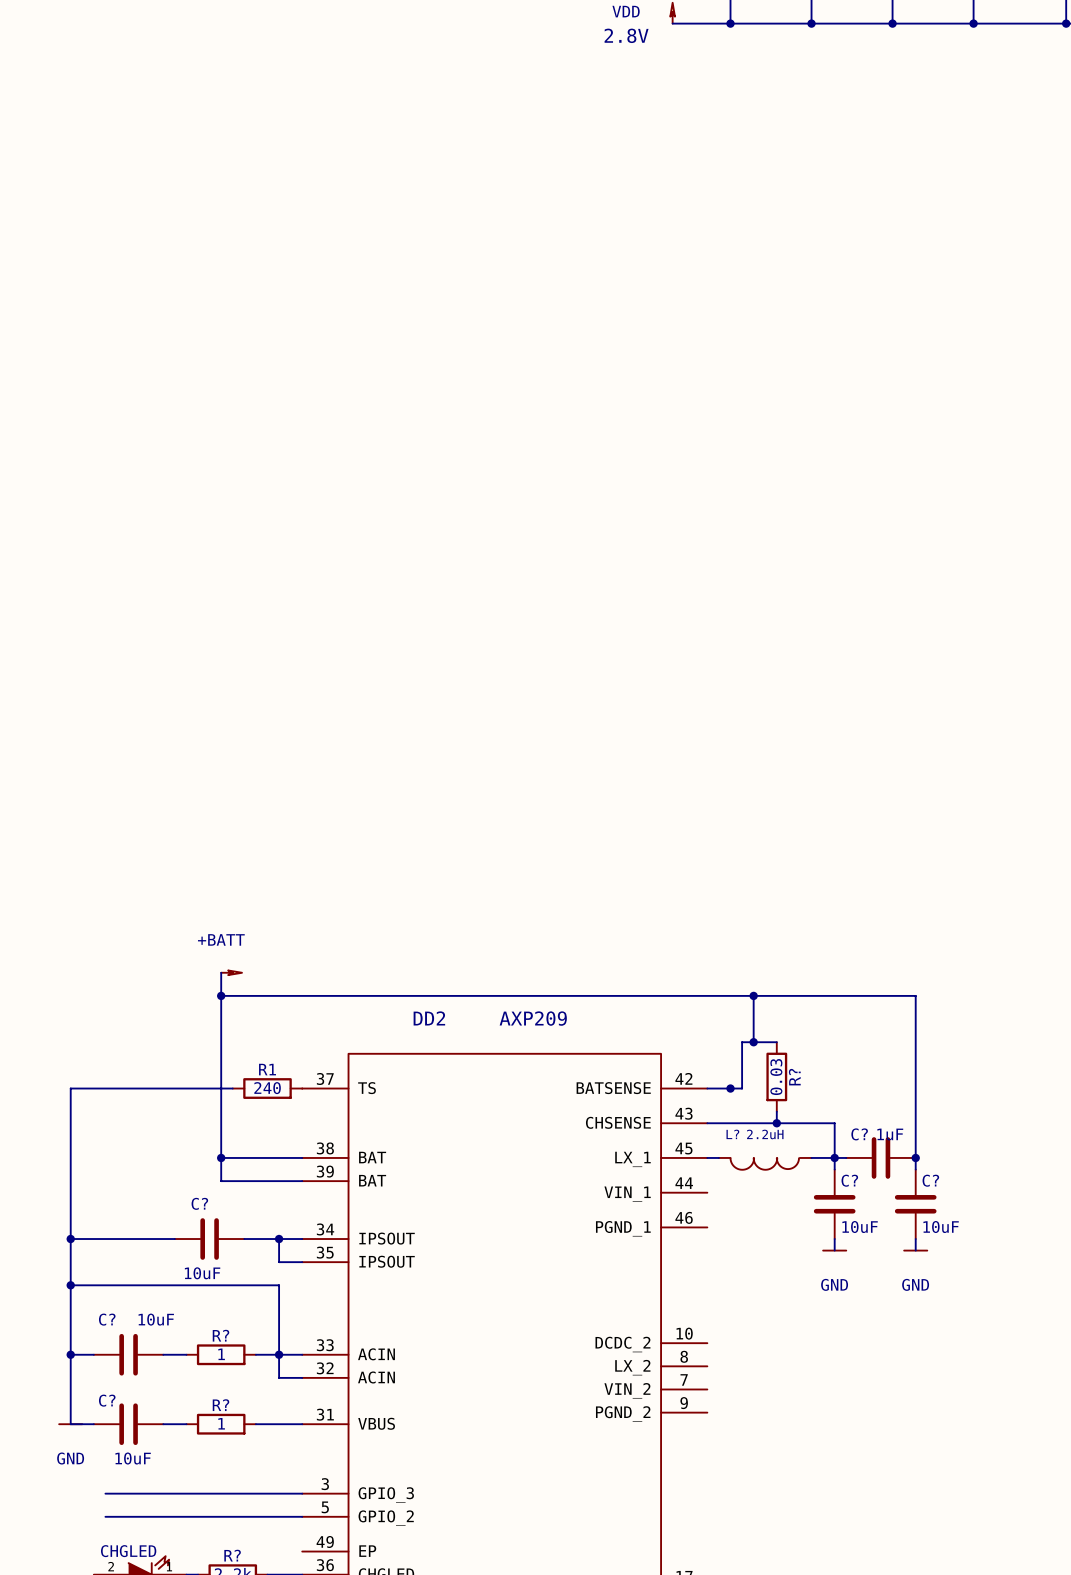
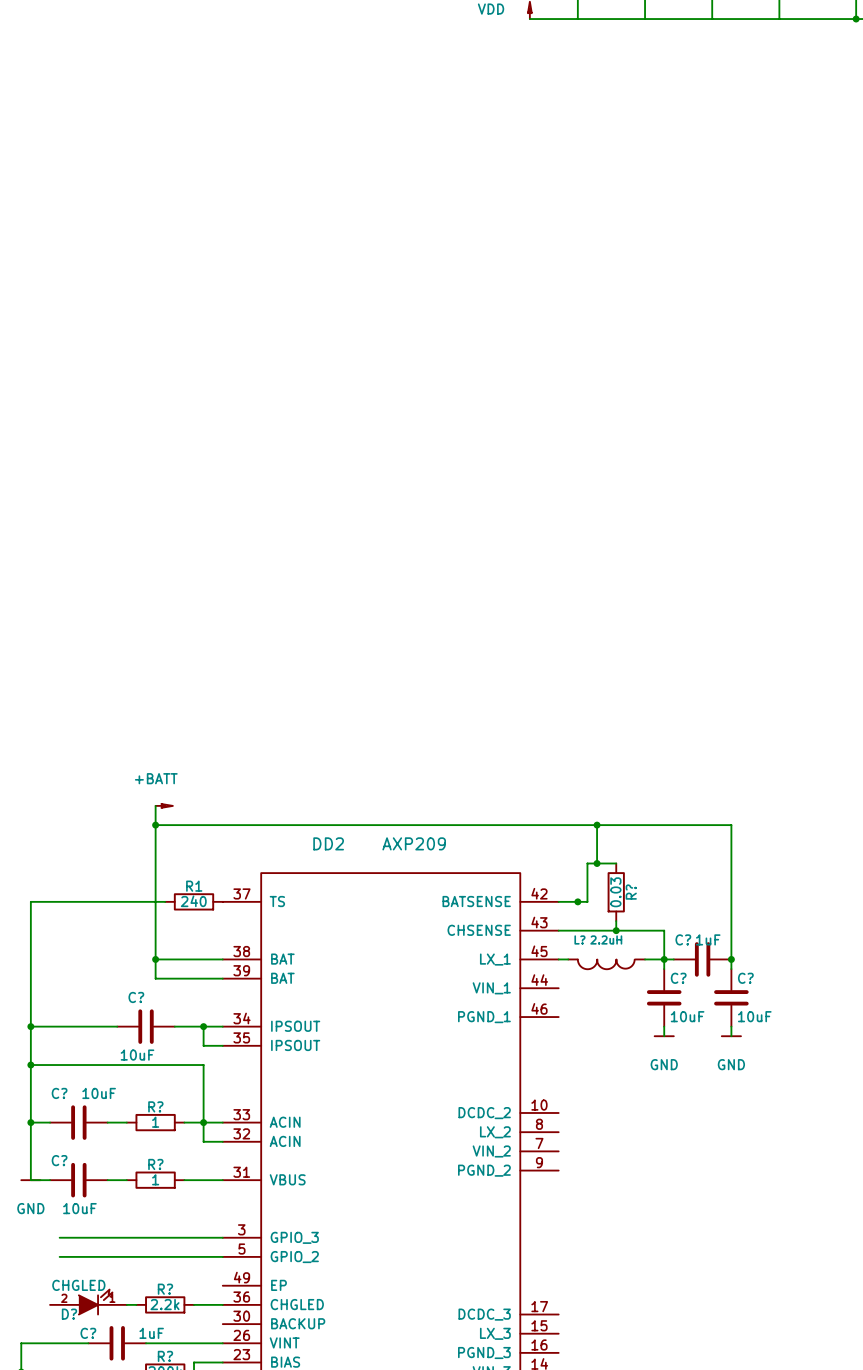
junction: (730, 23) -> none
junction: (811, 23) -> none
junction: (892, 23) -> none
junction: (973, 23) -> none
text: 2.8V (626, 35) -> none

